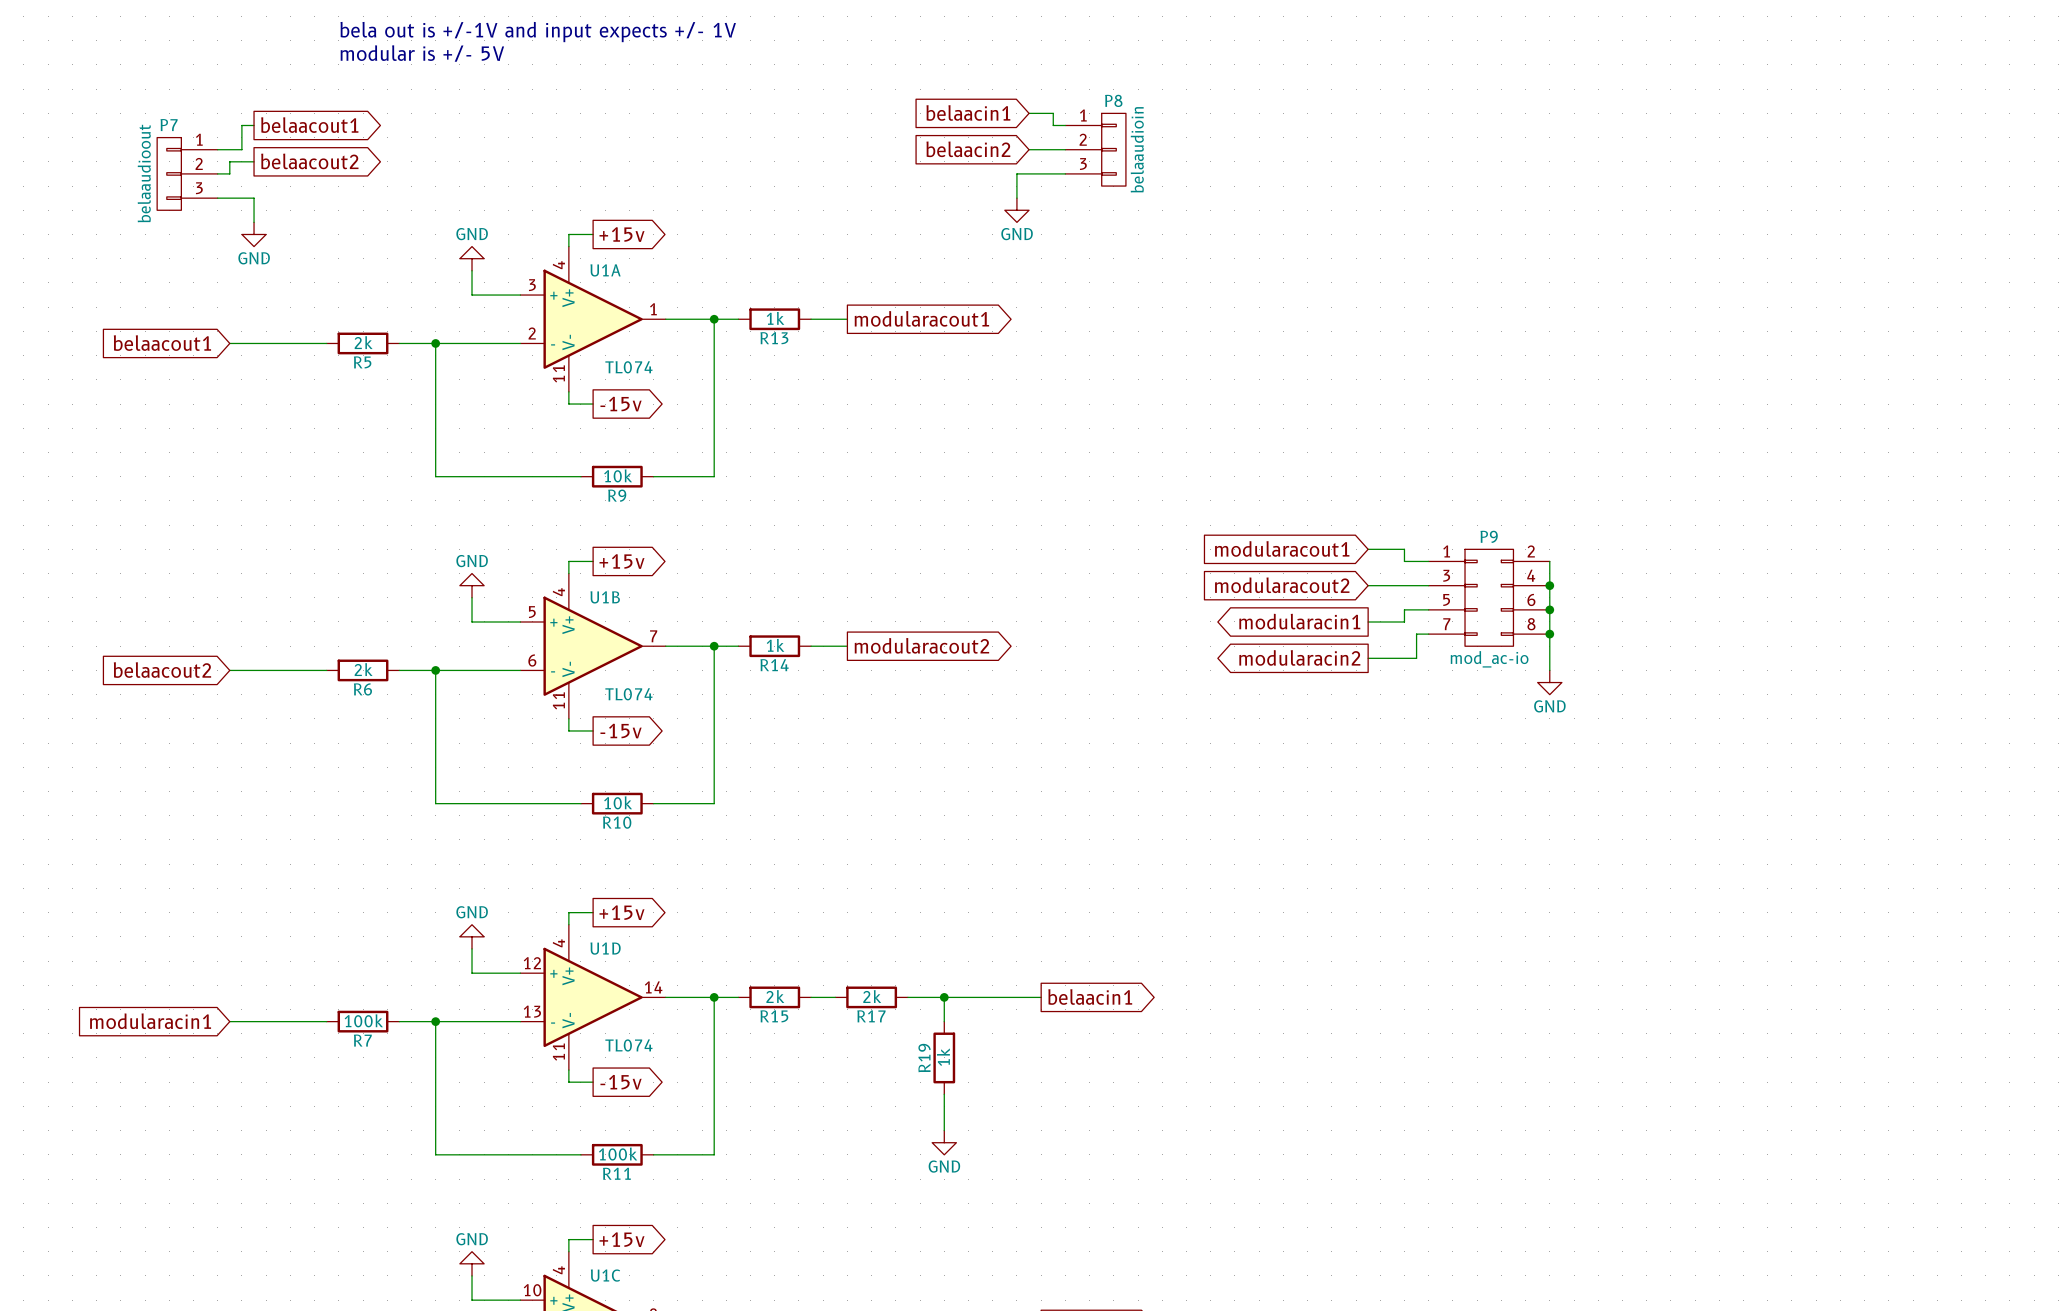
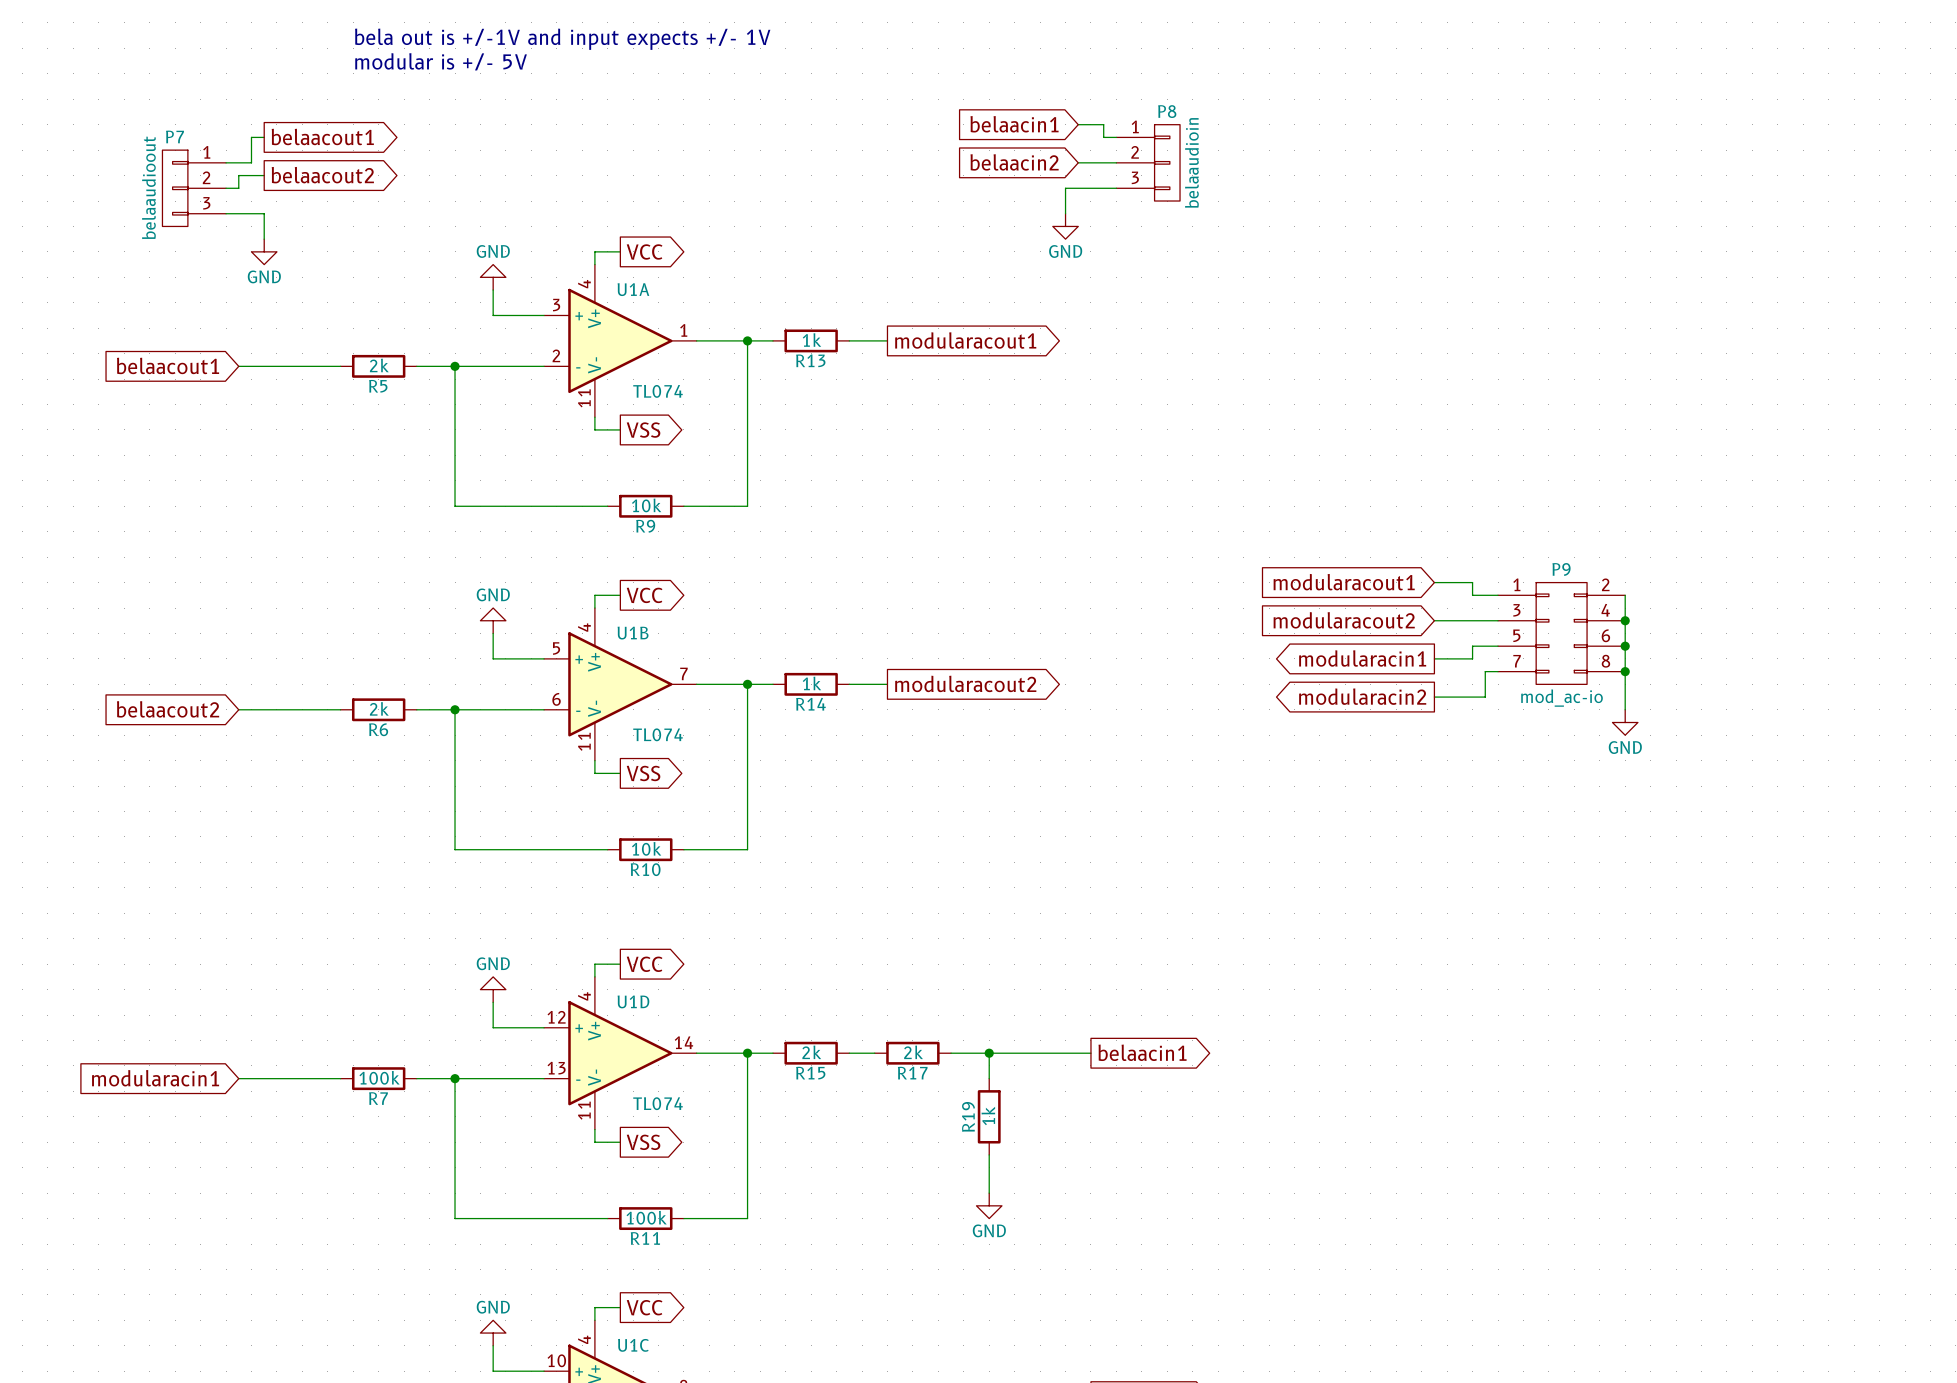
global label: +15v (621, 234) -> VCC (644, 251)
global label: -15v (621, 404) -> VSS (643, 430)
global label: +15v (621, 561) -> VCC (644, 595)
global label: -15v (621, 731) -> VSS (643, 773)
global label: +15v (621, 912) -> VCC (644, 964)
global label: -15v (621, 1082) -> VSS (643, 1142)
global label: +15v (621, 1239) -> VCC (644, 1307)

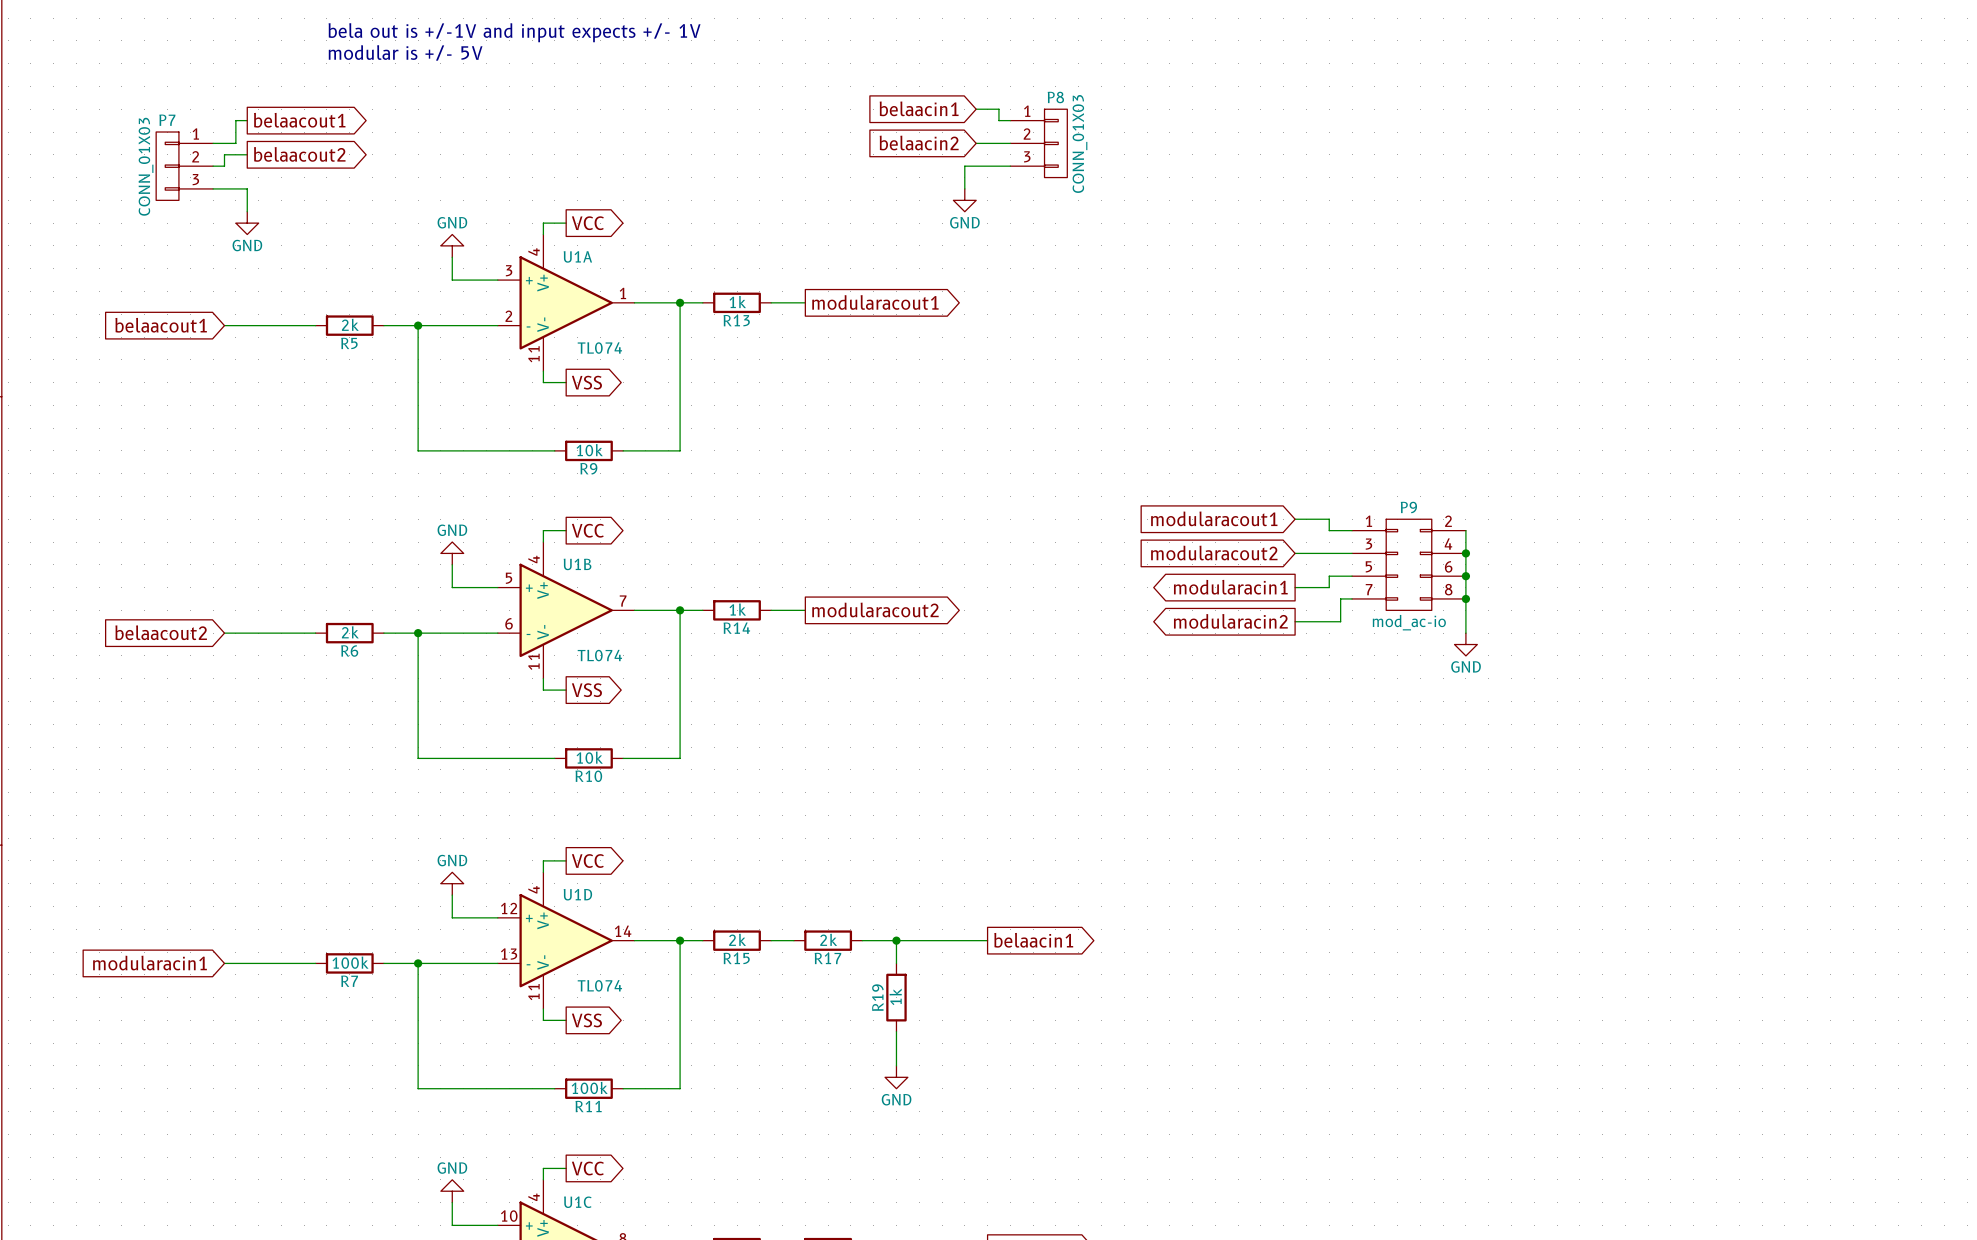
P8 value: belaaudioin (1191, 162) -> CONN_01X03 (1079, 143)
P7 value: belaaudioout (148, 187) -> CONN_01X03 (146, 166)

